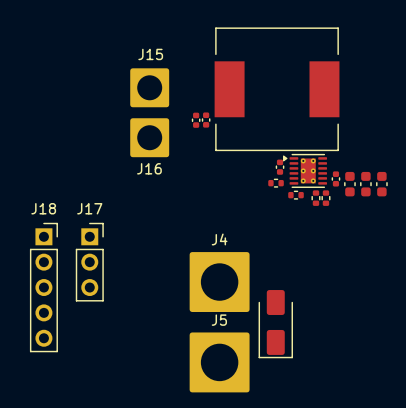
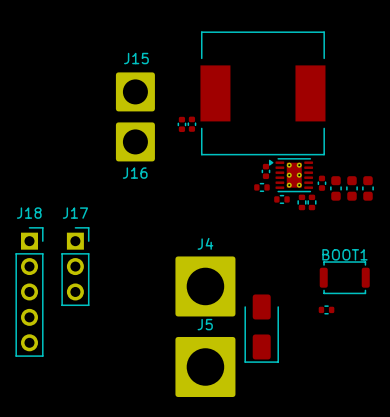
BOOT1: none -> (344, 277)
part: none -> (326, 309)

